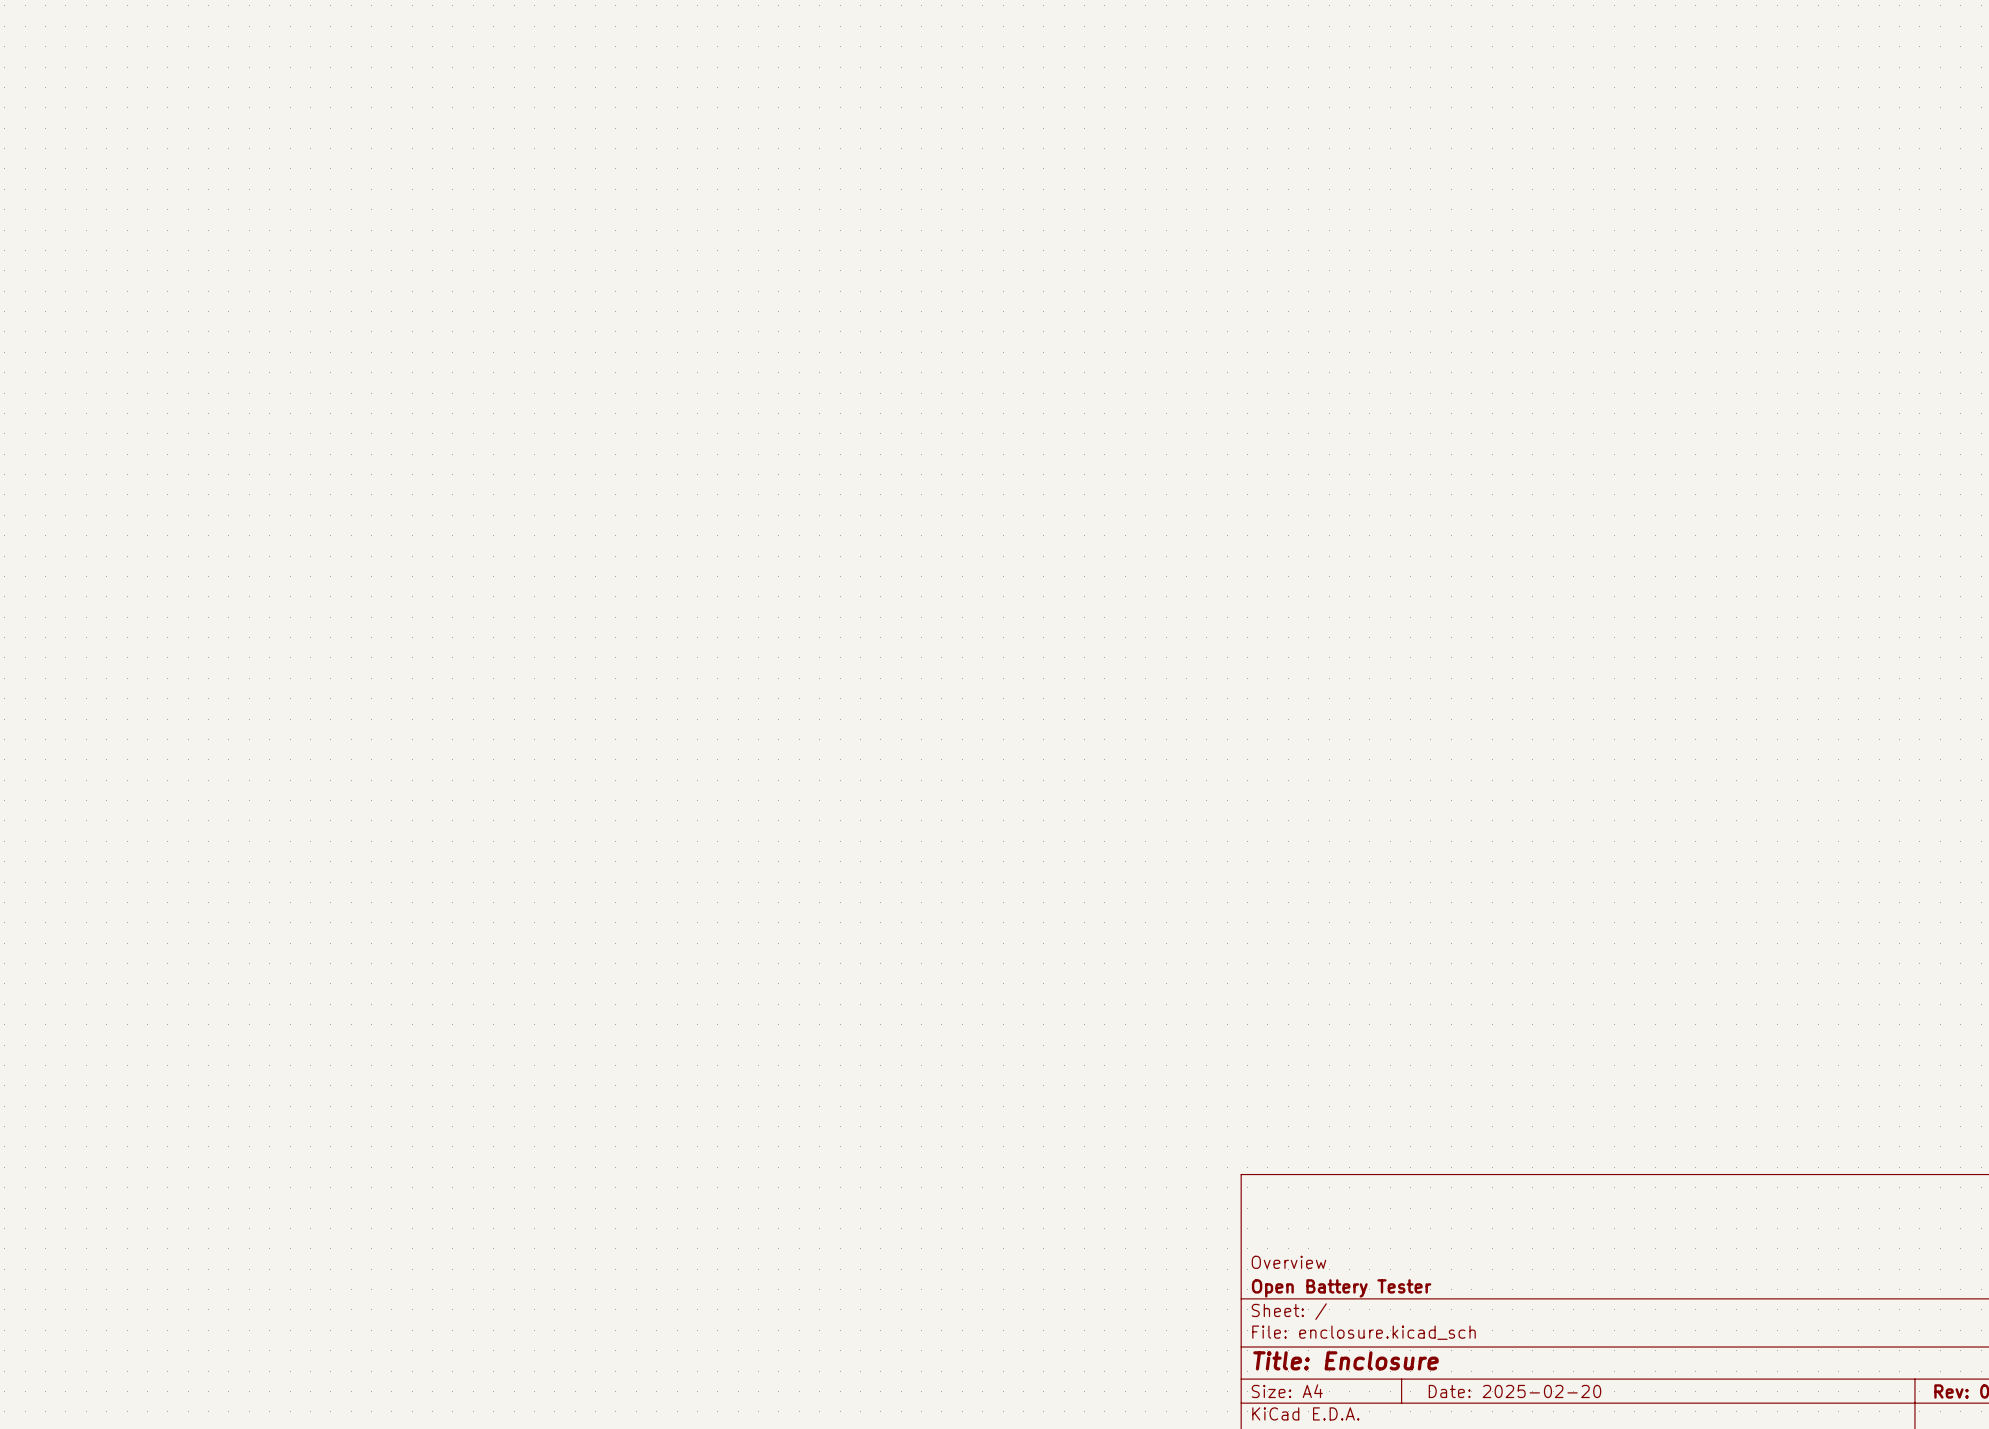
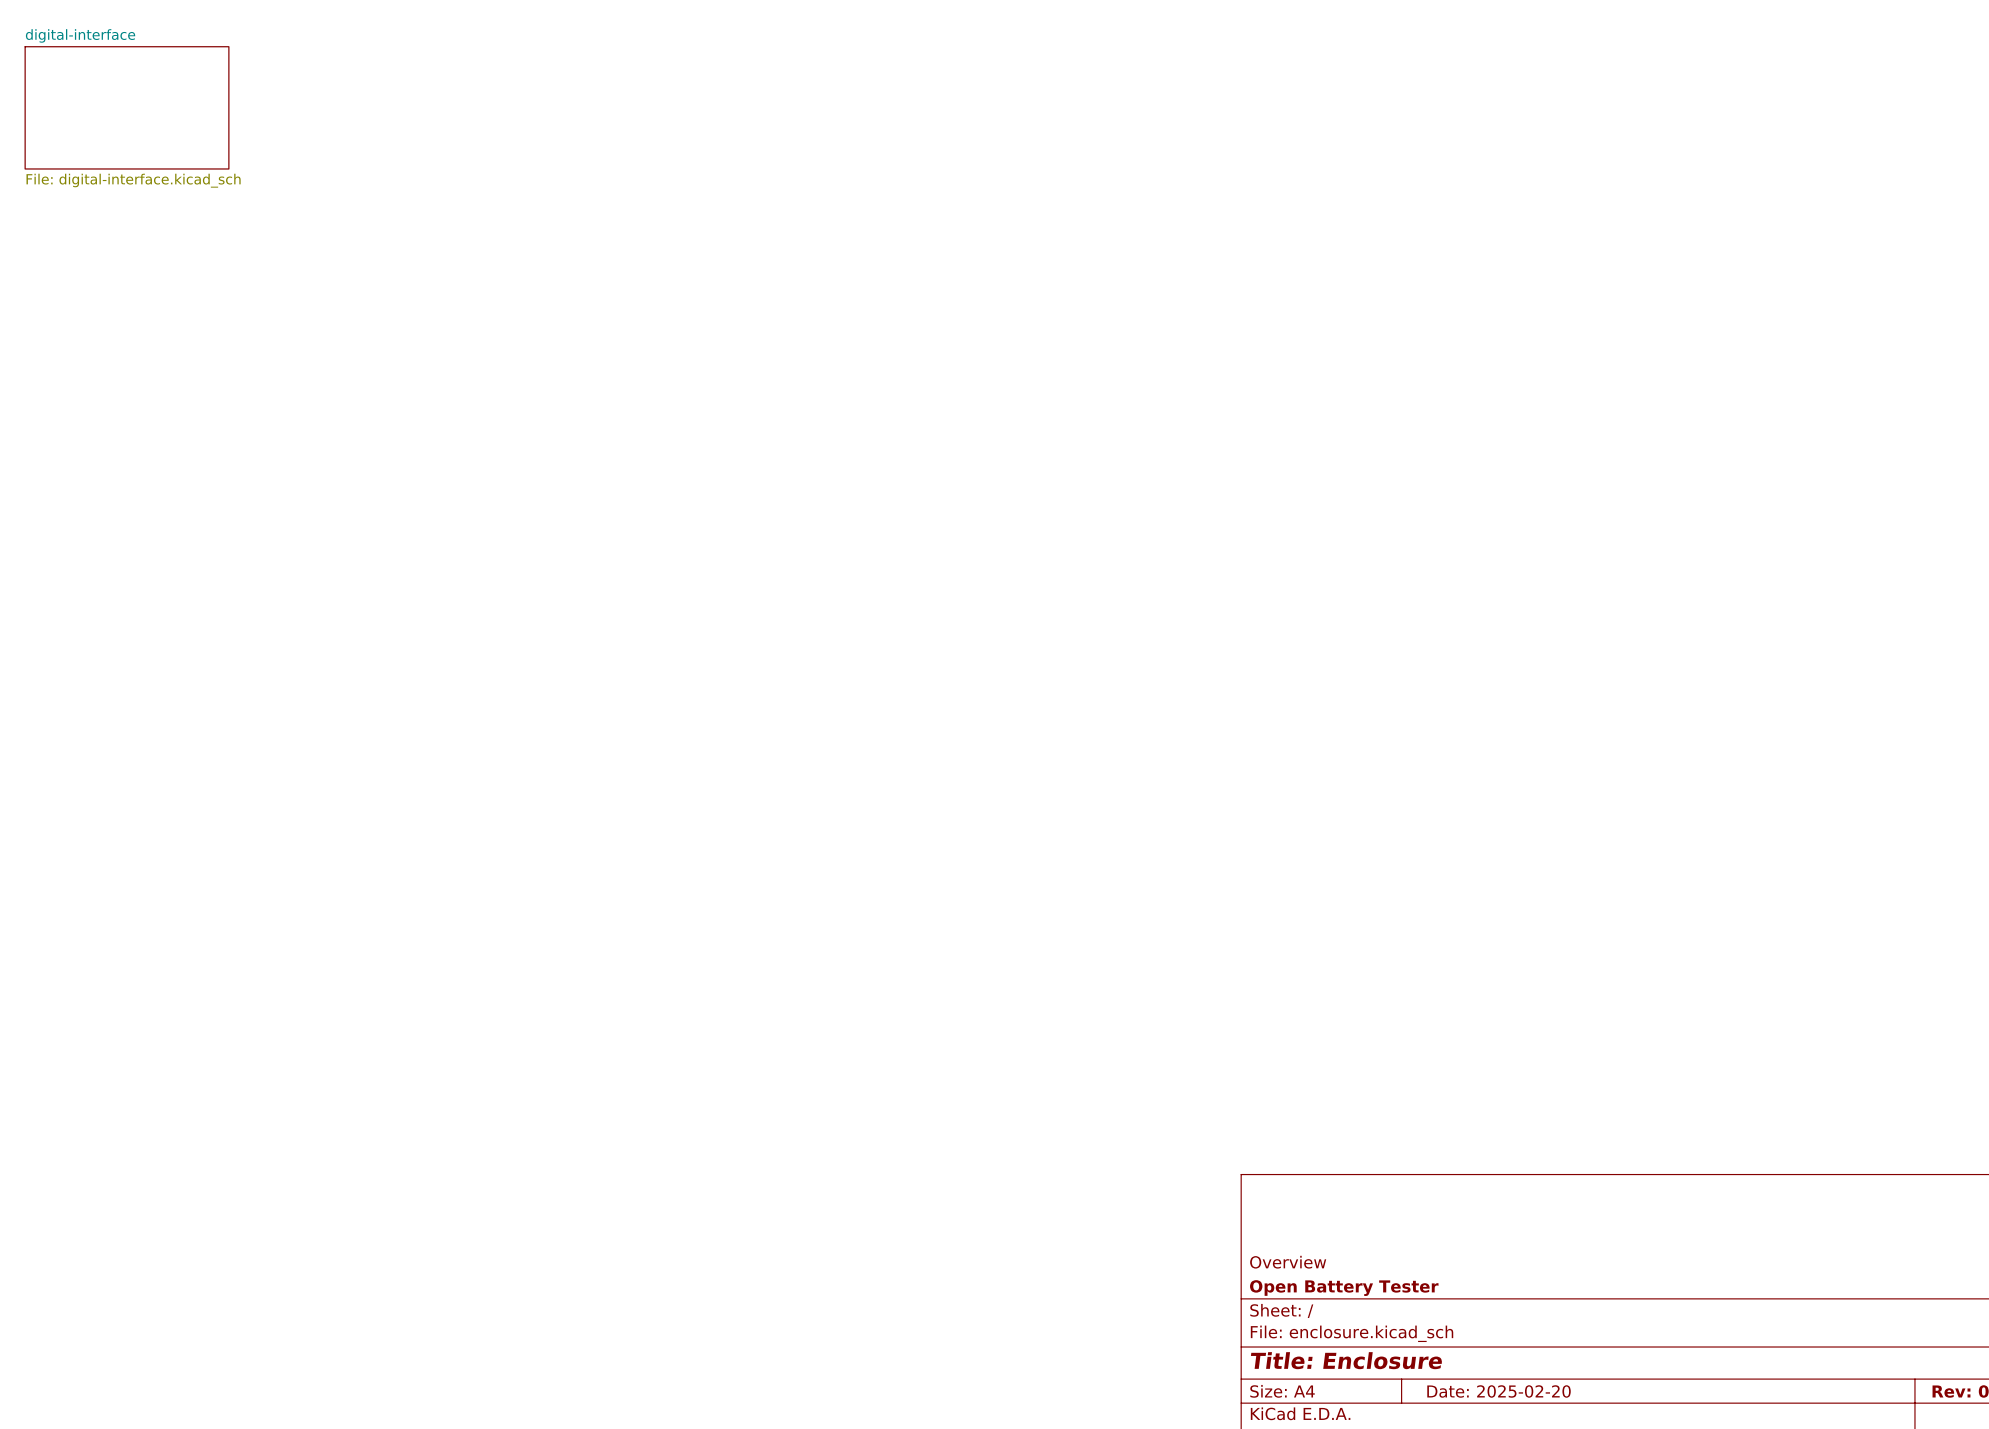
sheet digital-interface: none -> File: digital-interface.kicad_sch (127, 107)

